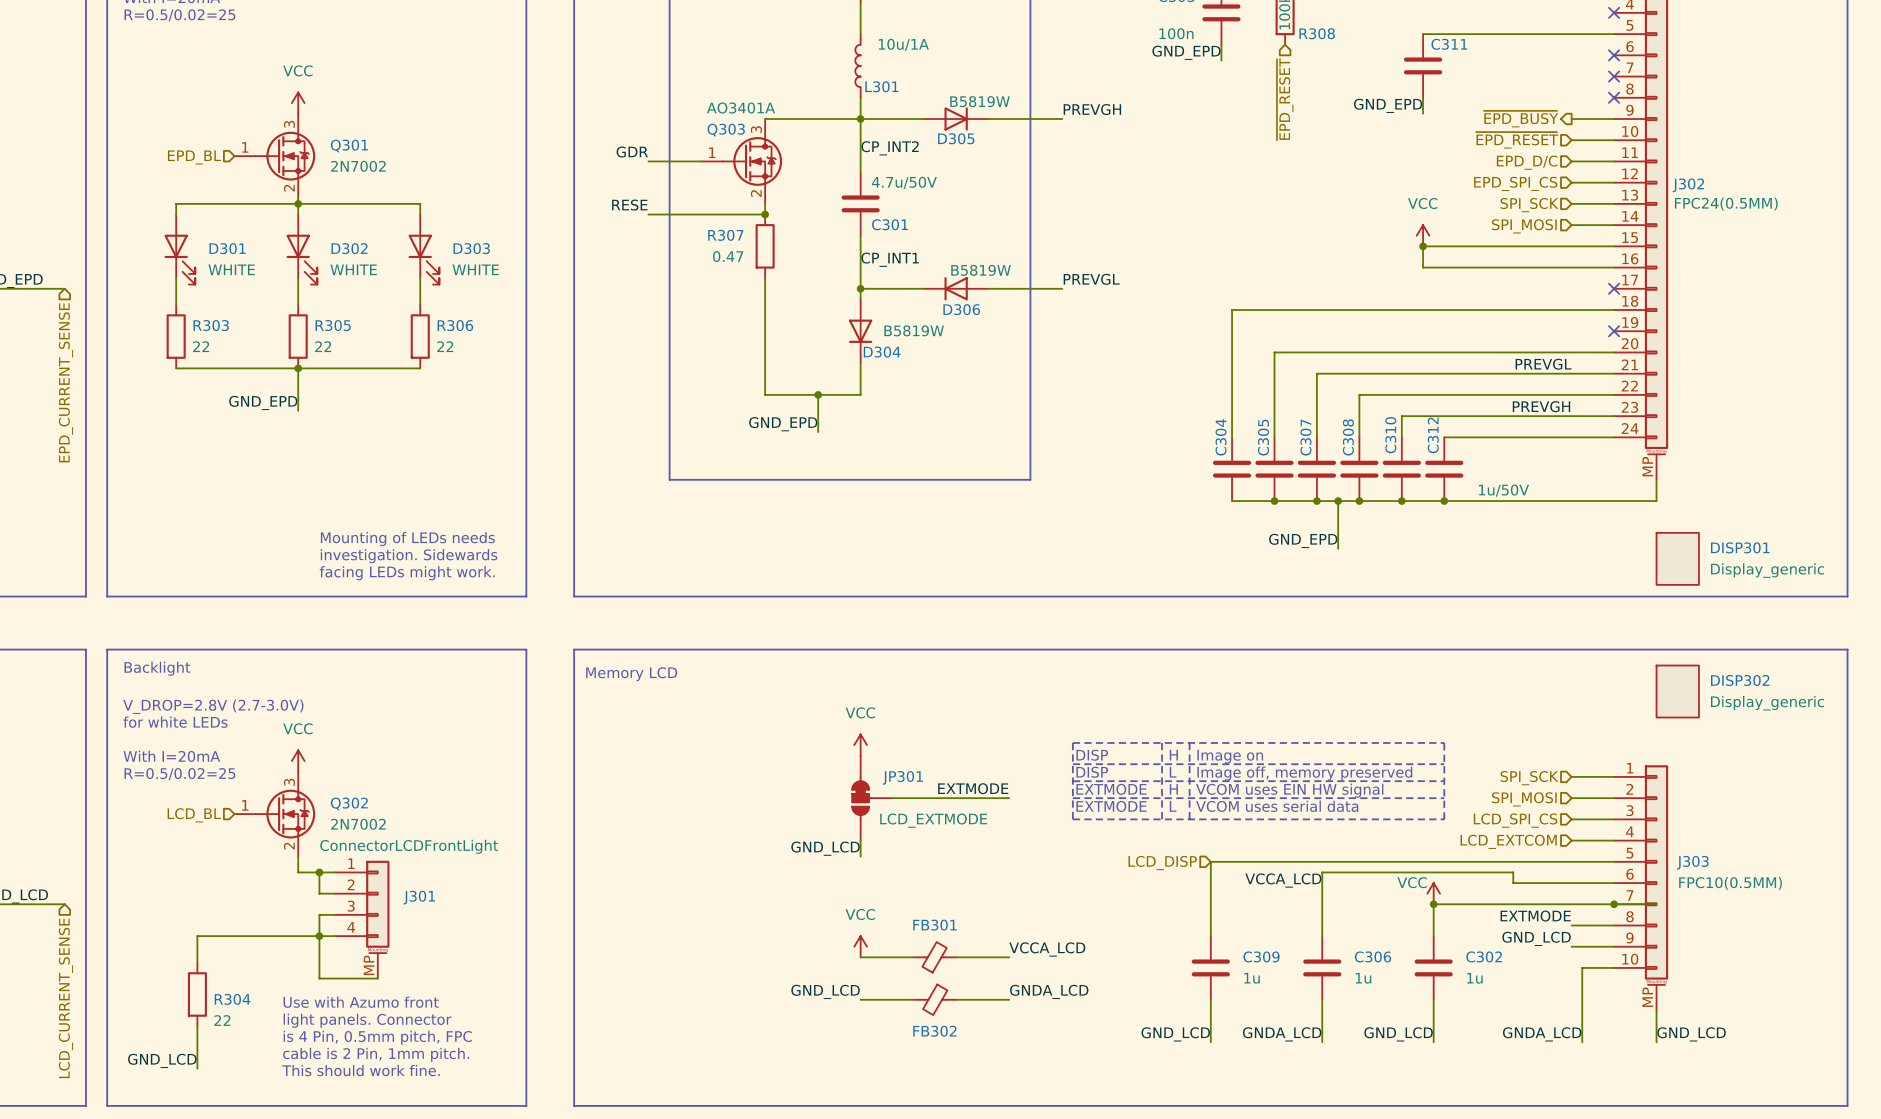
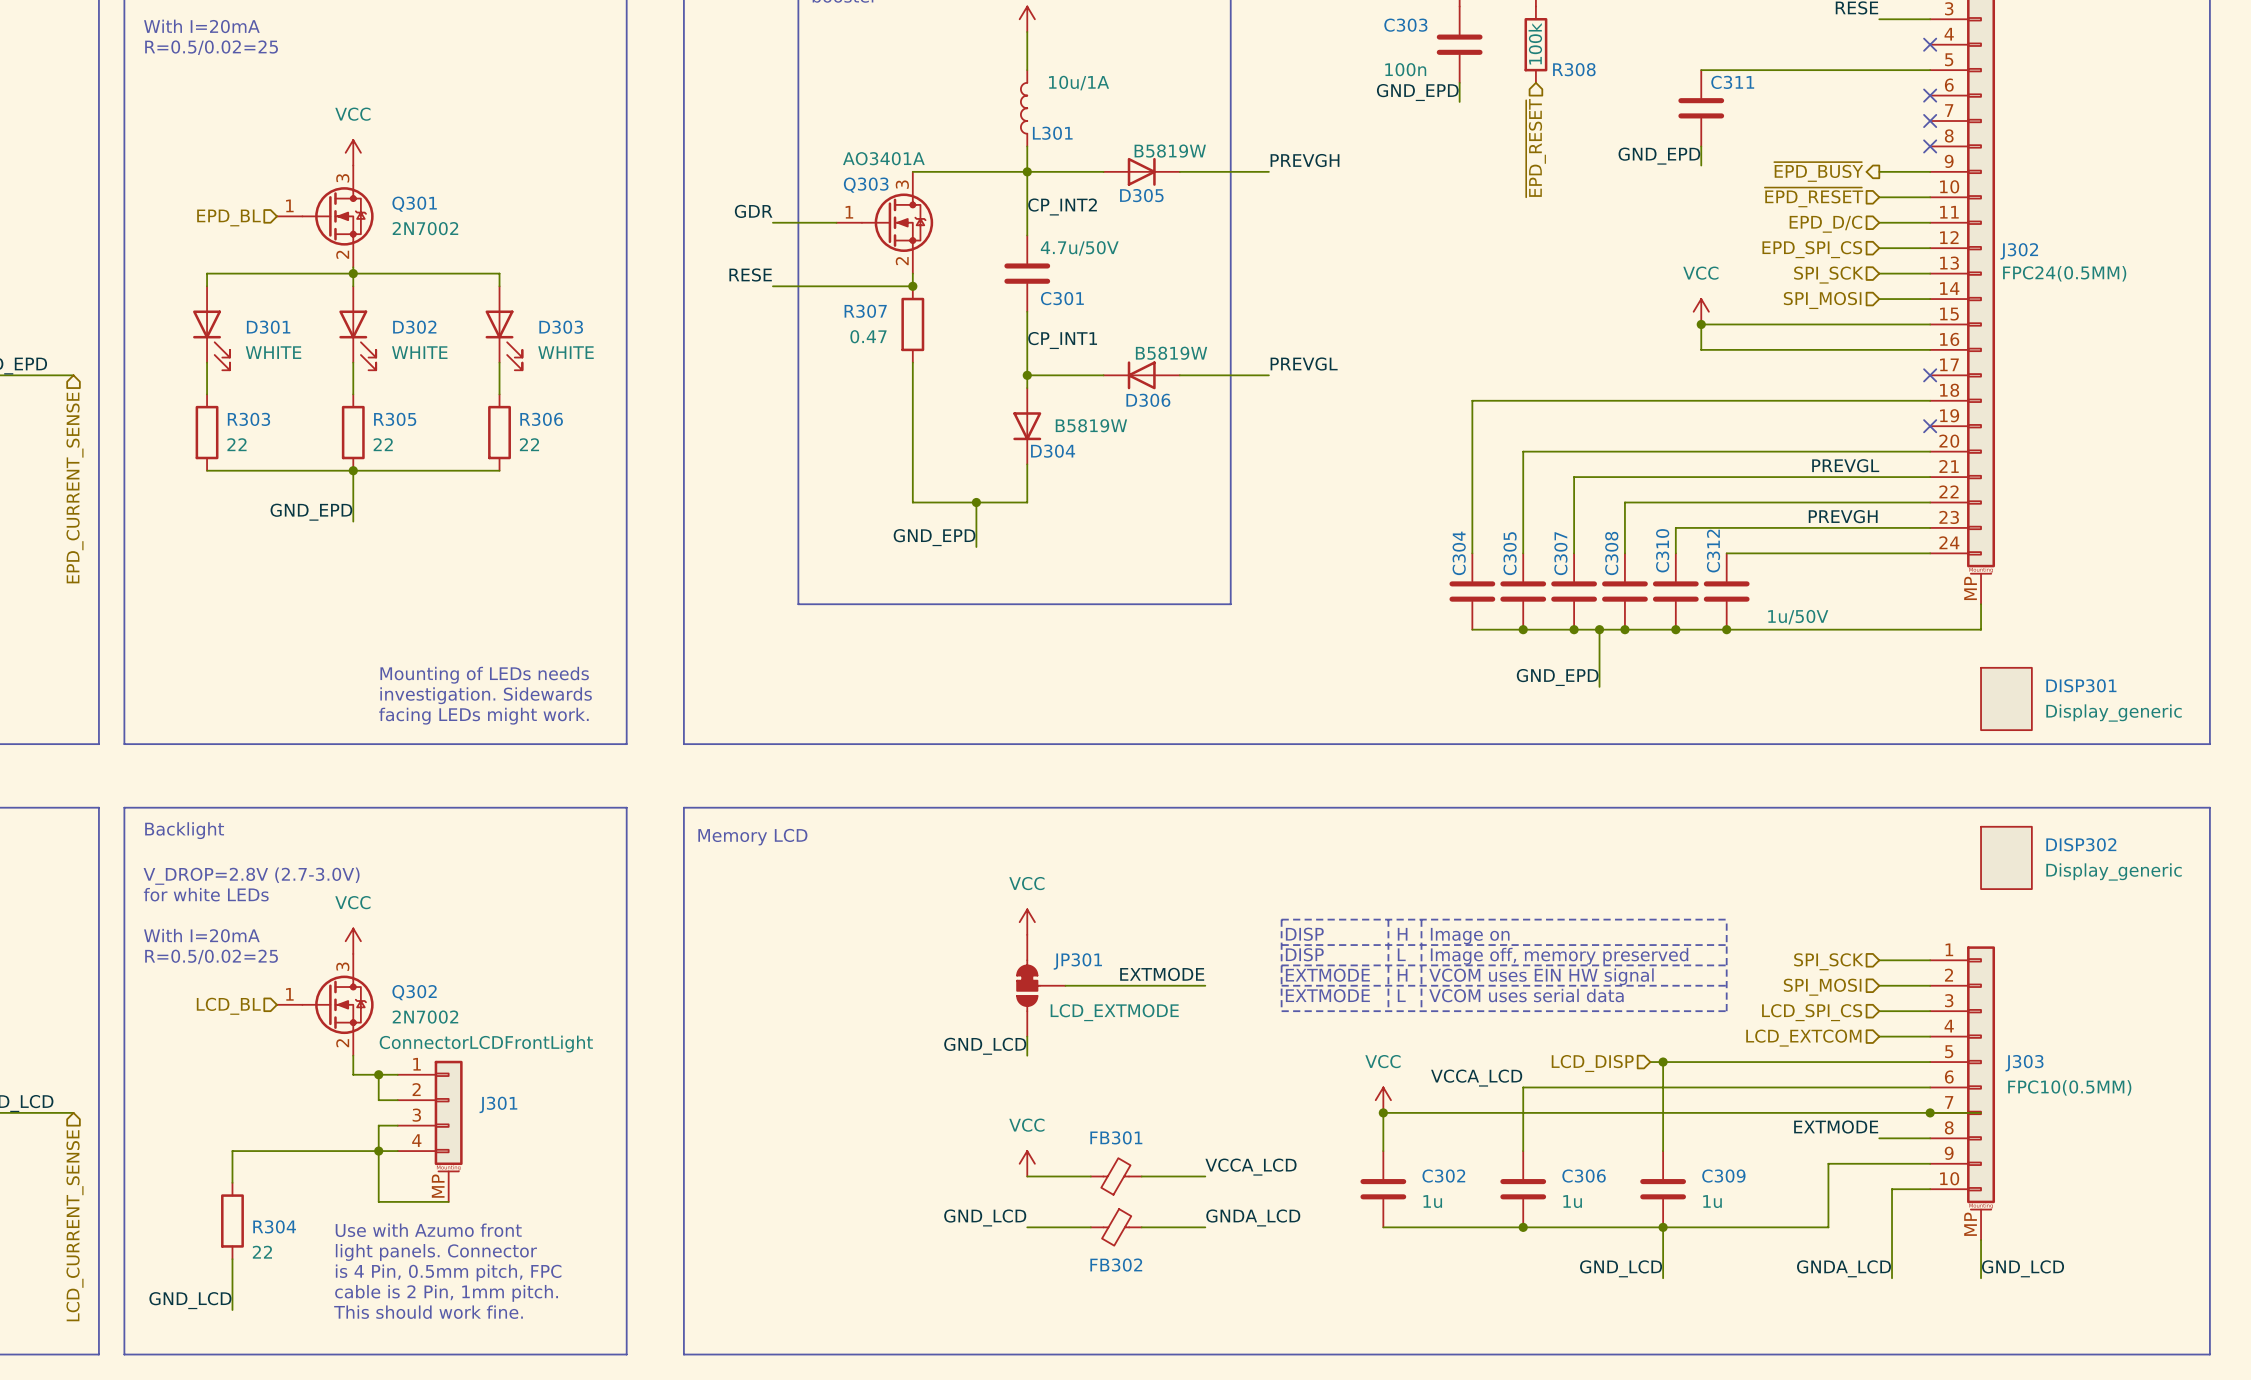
wire: (1380, 861) (1210, 861) (1210, 936) -> none
wire: none -> (1663, 1062) (1663, 1151)
junction: none -> (1663, 1062)
hierarchical label position: LCD_DISP (1162, 863) -> LCD_DISP (1592, 1063)
label position: VCCA_LCD (1283, 880) -> VCCA_LCD (1476, 1078)
wire: (1513, 883) (1513, 872) (1322, 872) (1322, 936) -> (1809, 1087) (1523, 1087) (1523, 1151)
power symbol: none -> VCC (1383, 1100)
power symbol: VCC (1433, 893) -> none
junction: none -> (1383, 1112)
wire: (1433, 904) (1433, 936) -> (1713, 1112) (1383, 1112) (1383, 1151)
junction: (1433, 904) -> none
label: GND_LCD (1536, 938) -> none
wire: none -> (1879, 1163) (1828, 1163) (1828, 1227) (1383, 1227)
C309 position: (1210, 967) -> (1663, 1189)
C306 position: (1322, 967) -> (1523, 1189)
C302 position: (1433, 967) -> (1383, 1189)
wire: (1210, 999) (1210, 1042) -> none
junction: none -> (1523, 1227)
wire: (1322, 999) (1322, 1042) -> none
junction: none -> (1663, 1227)
wire: (1433, 999) (1433, 1042) -> (1663, 1227) (1663, 1278)
label: GND_LCD (1175, 1034) -> none
label: GNDA_LCD (1282, 1034) -> none
label position: GND_LCD (1398, 1034) -> GND_LCD (1621, 1268)

